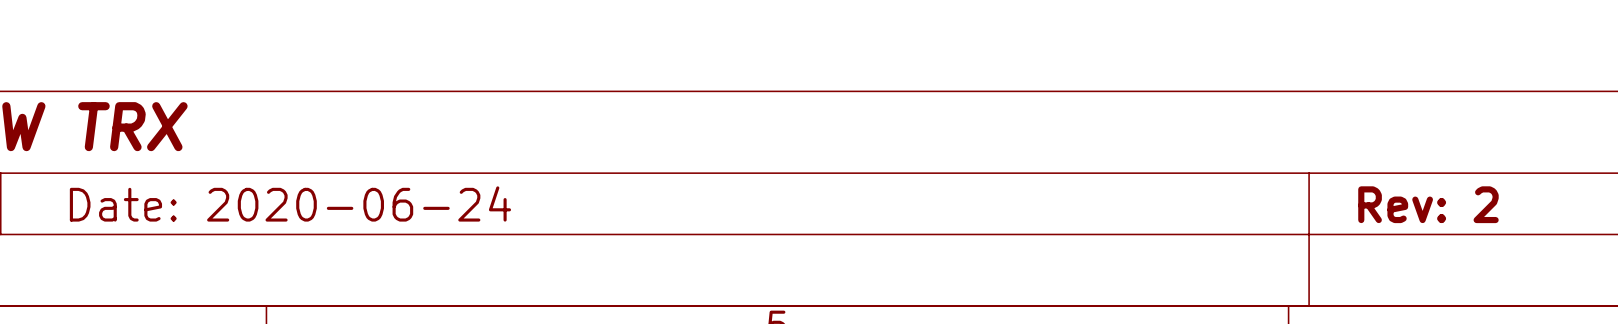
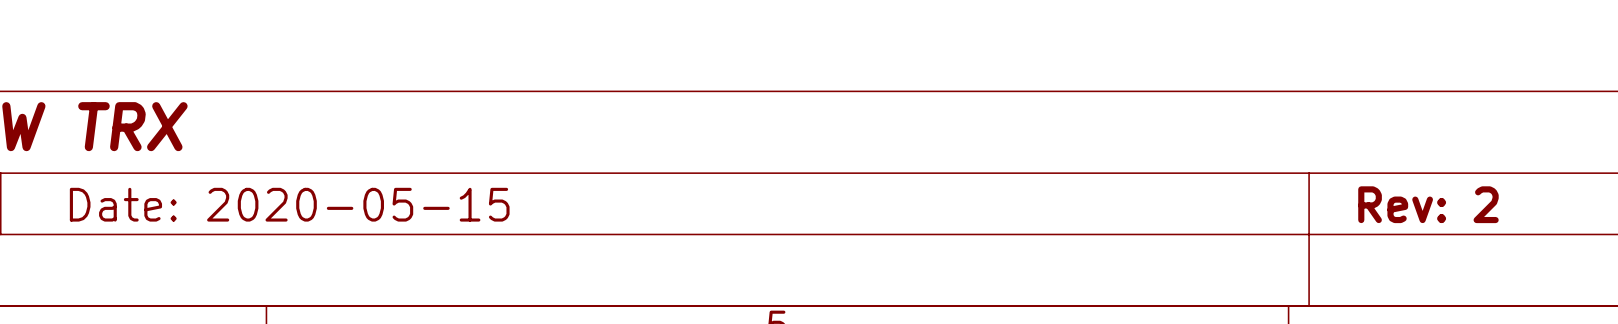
title block: Date: 2020-06-24 (290, 203) -> Date: 2020-05-15 (289, 204)

